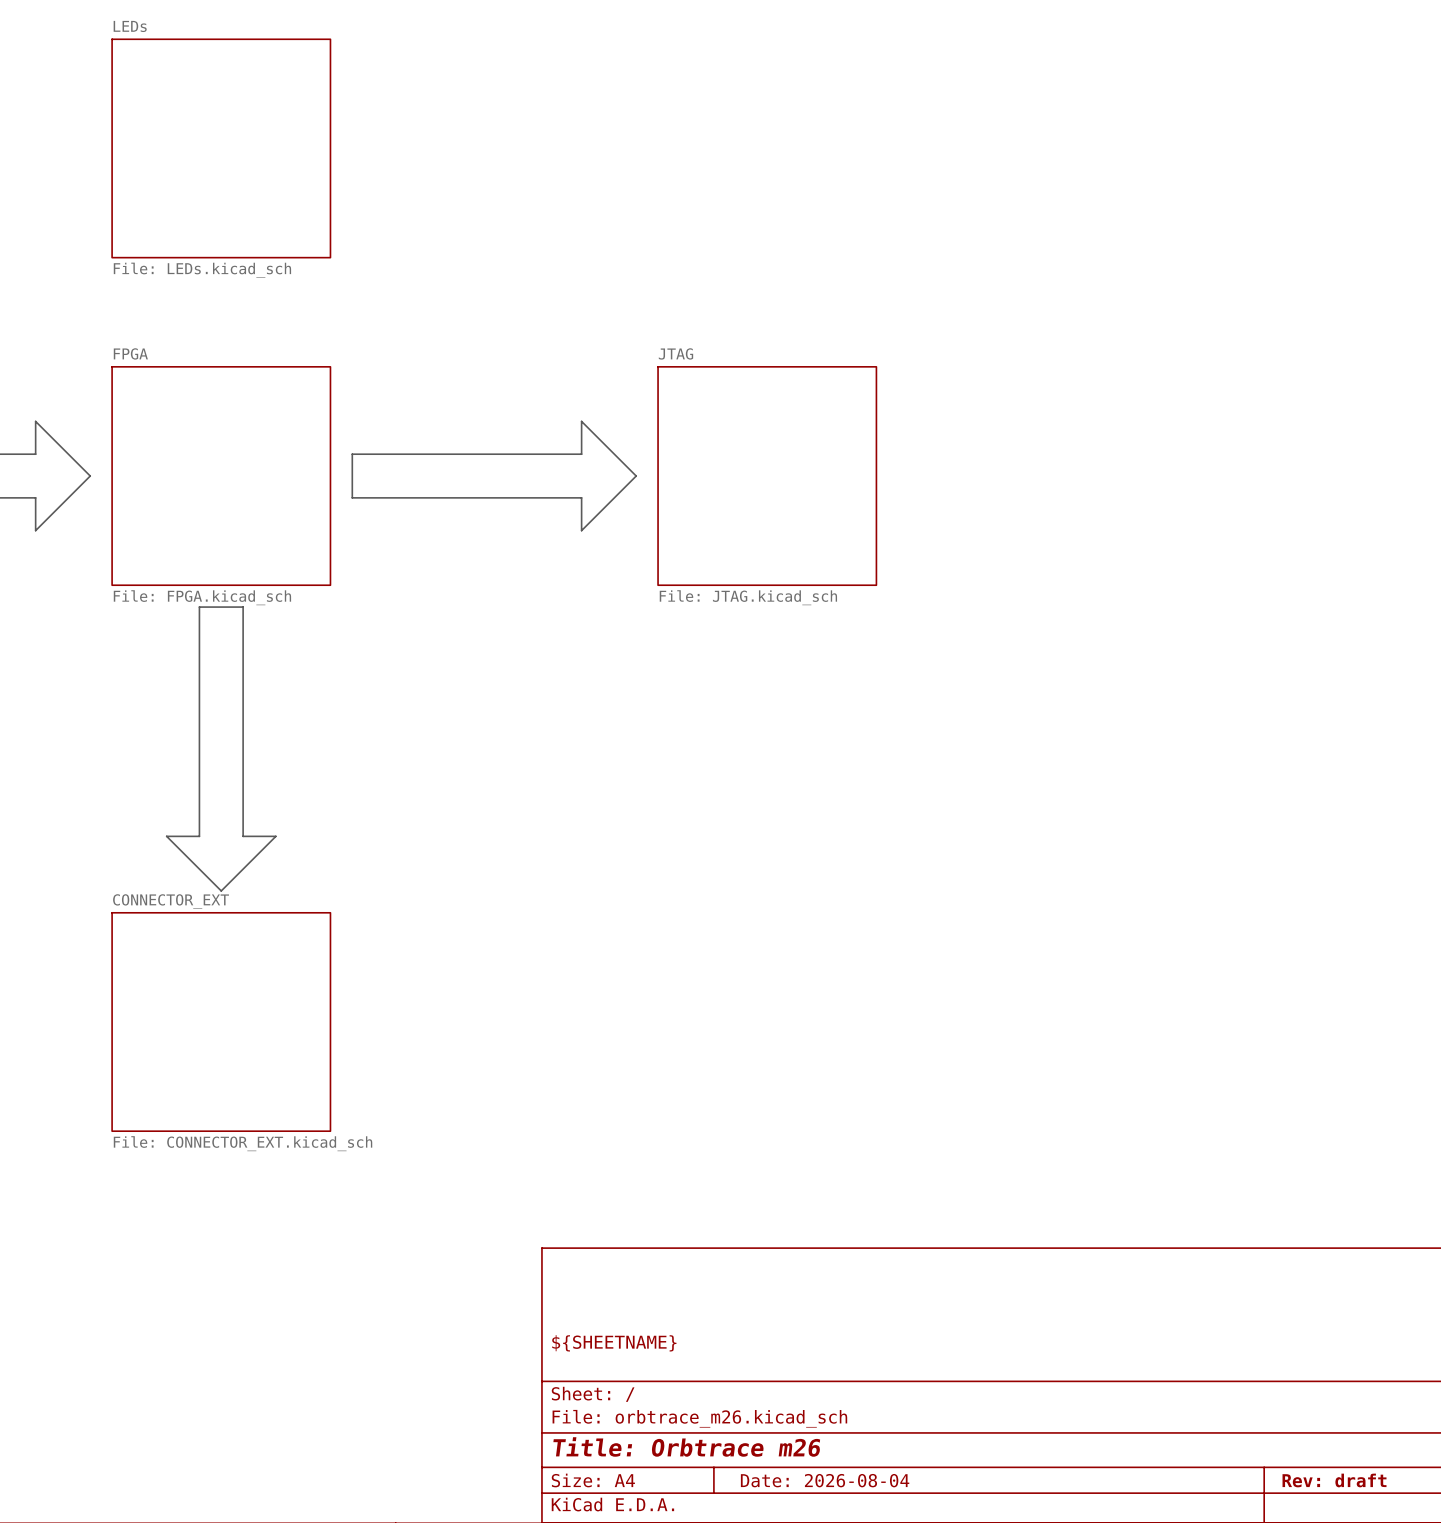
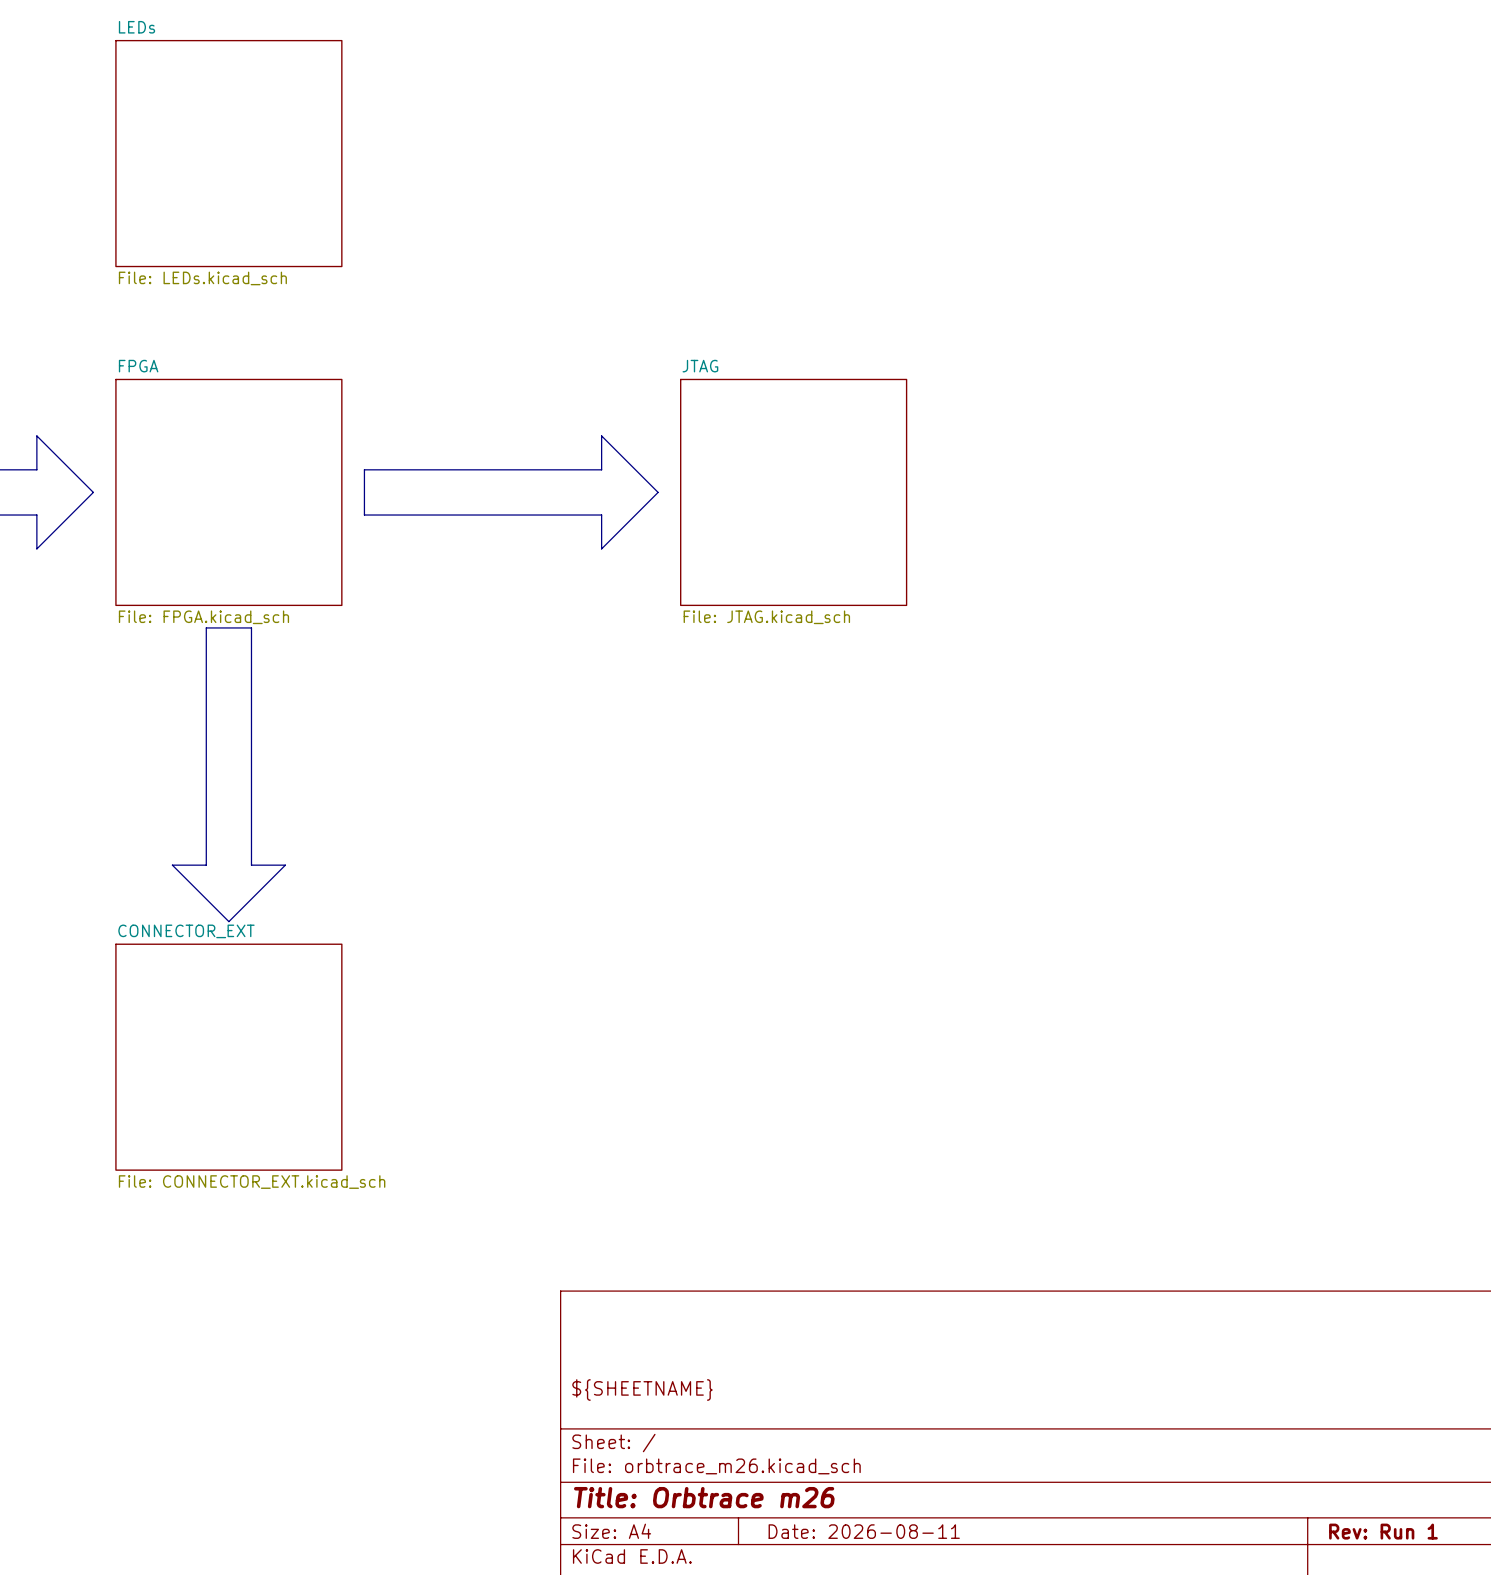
title block: Date: 2026-08-04 (825, 1480) -> Date: 2026-08-11 (864, 1531)
title block: Rev: draft (1334, 1480) -> Rev: Run 1 (1383, 1531)

